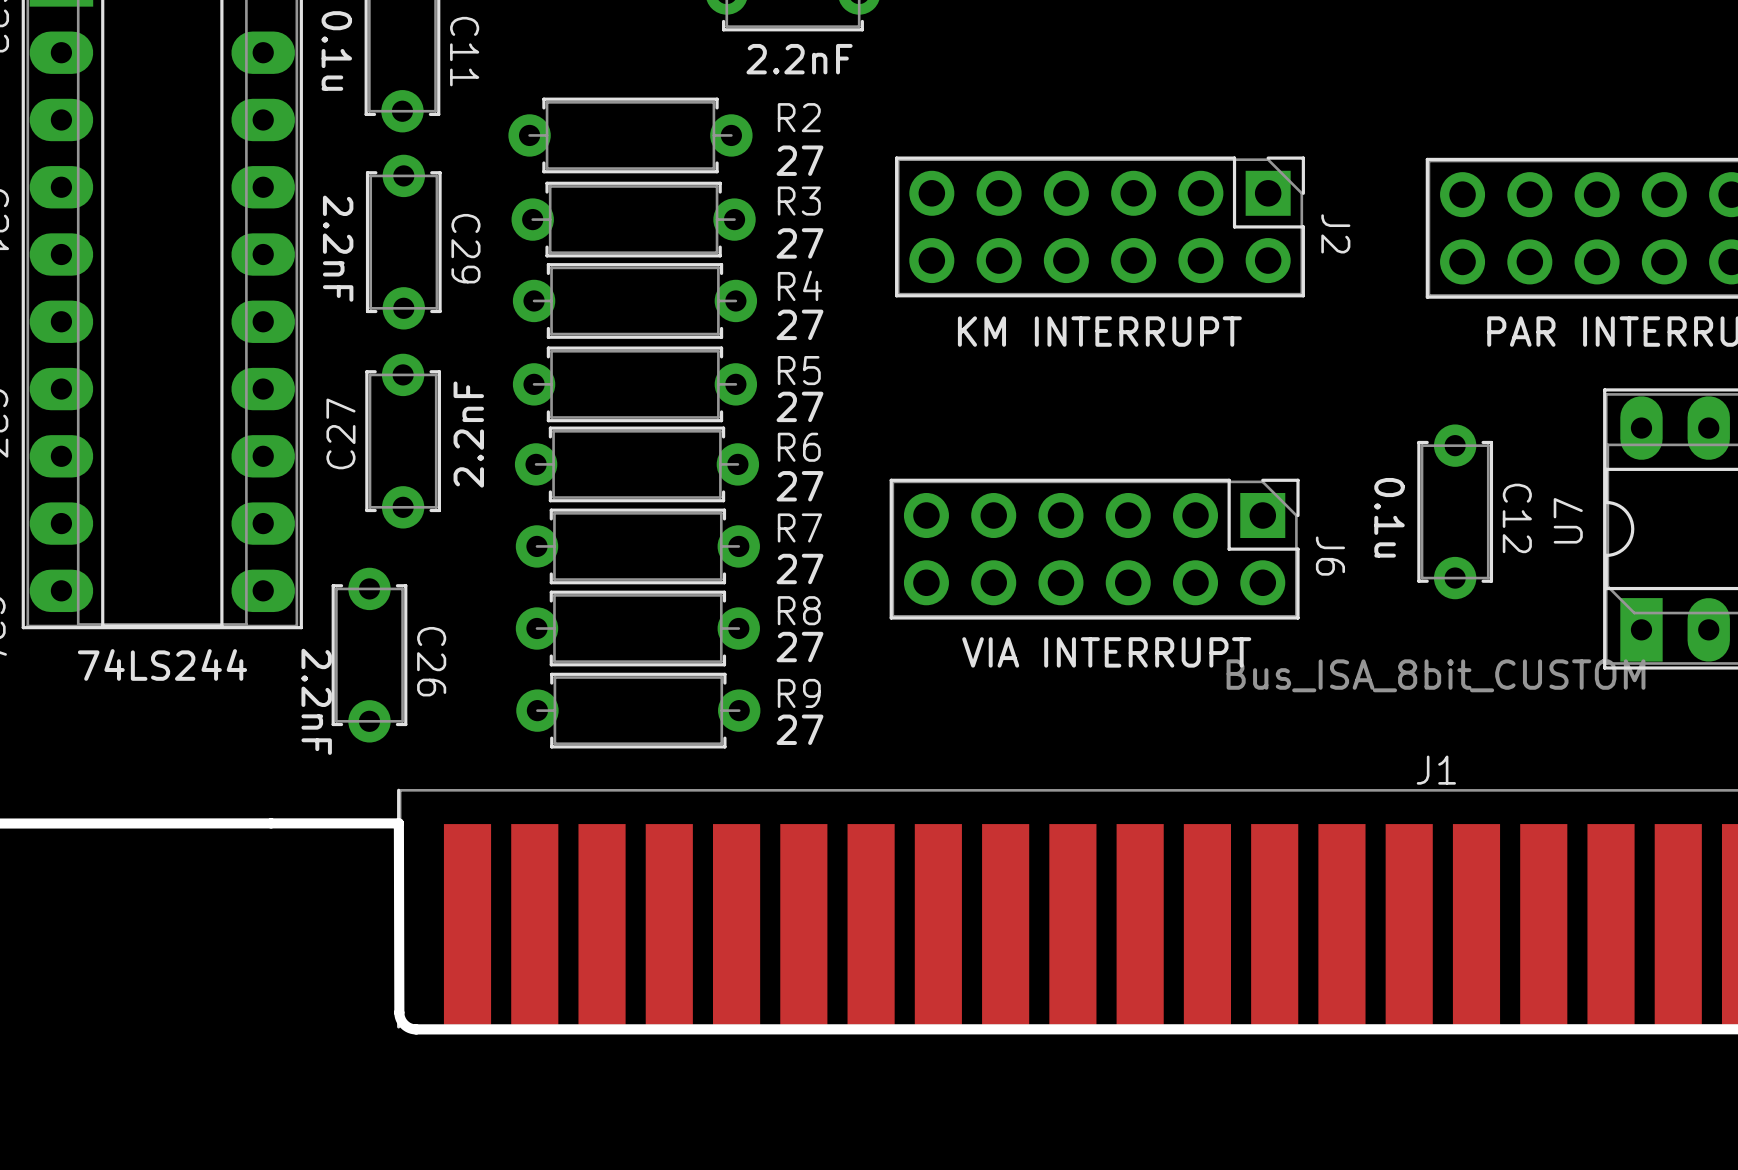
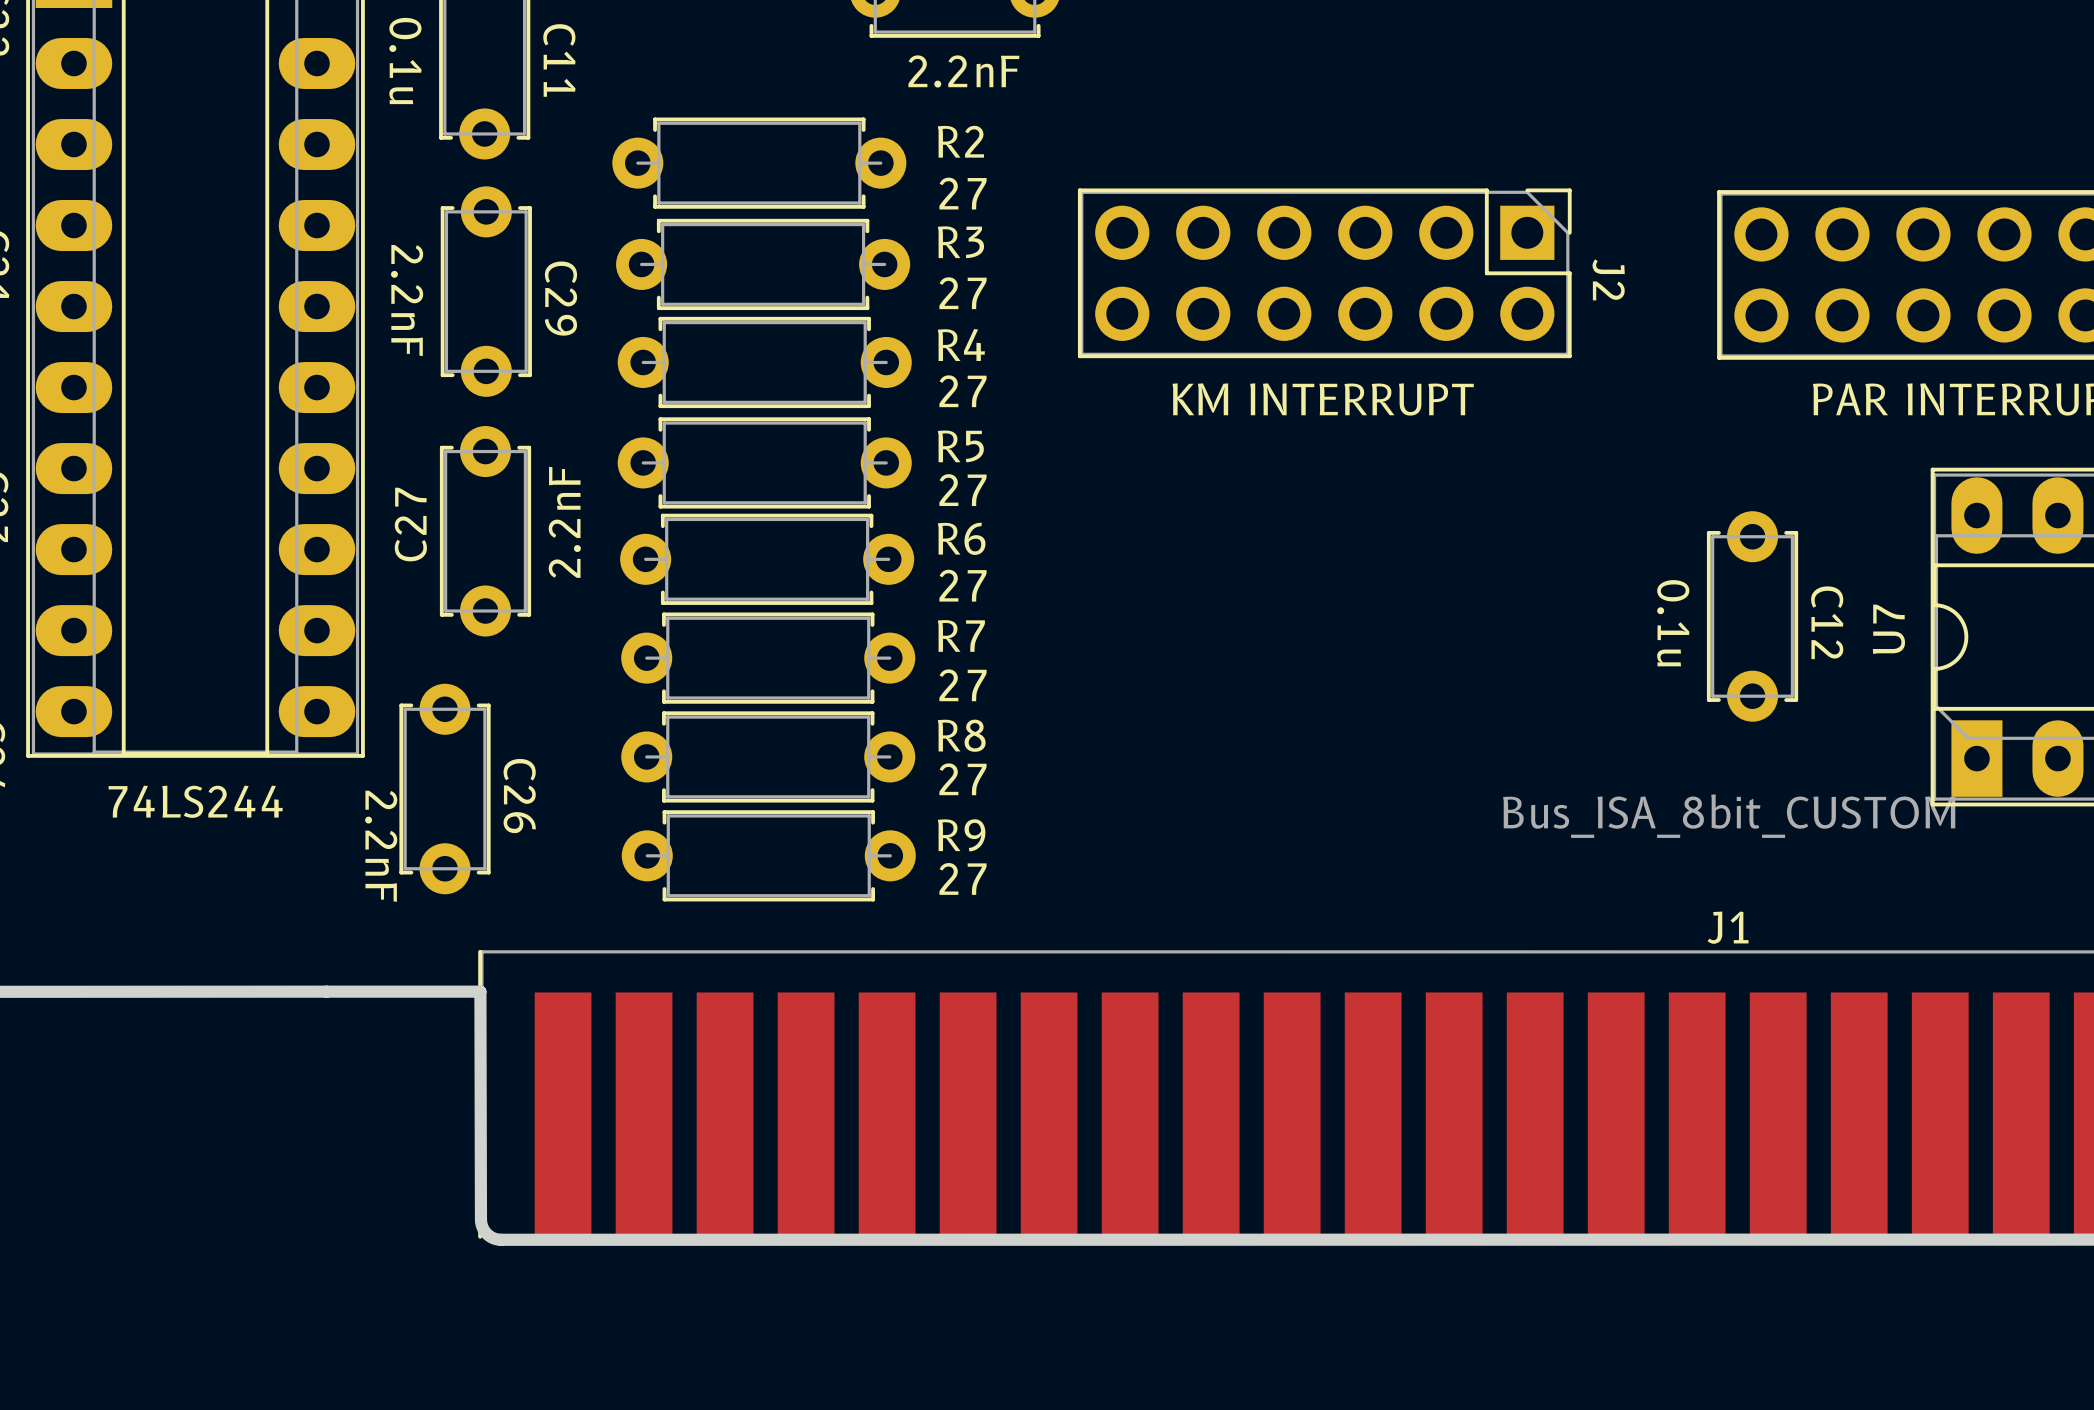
J6: VIA INTERRUPT (1094, 549) -> none

